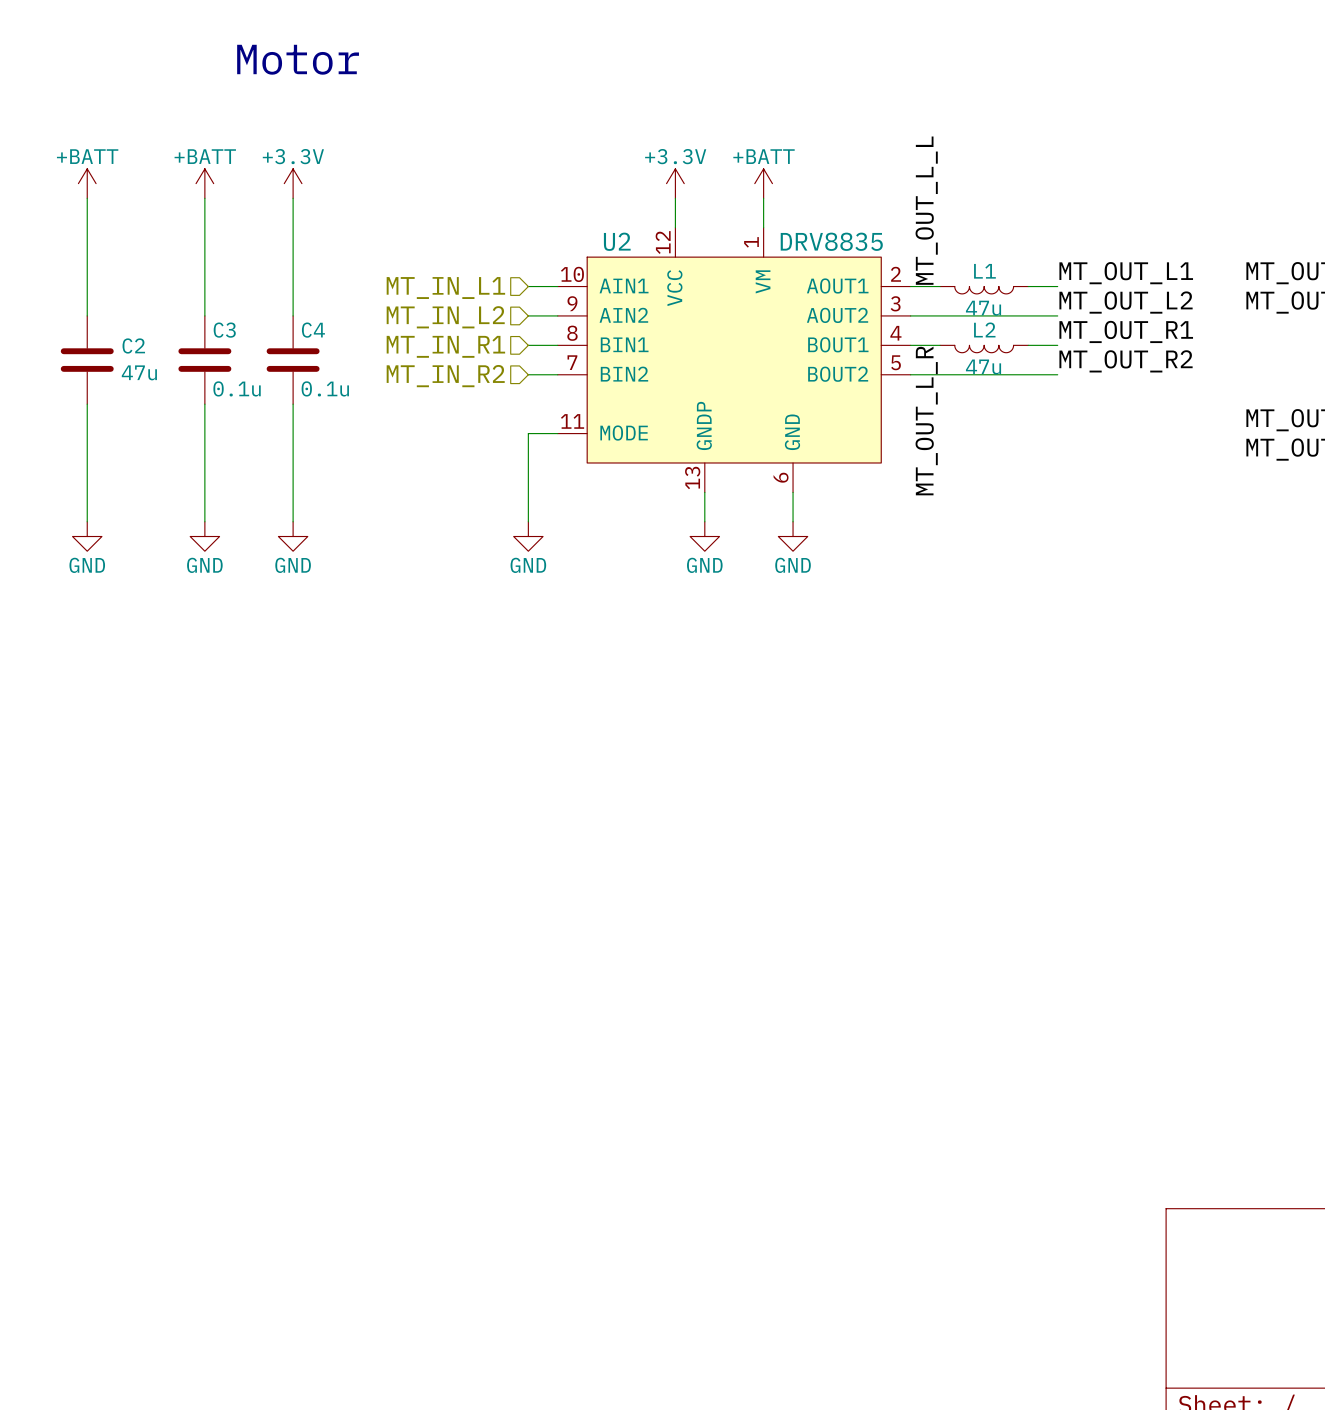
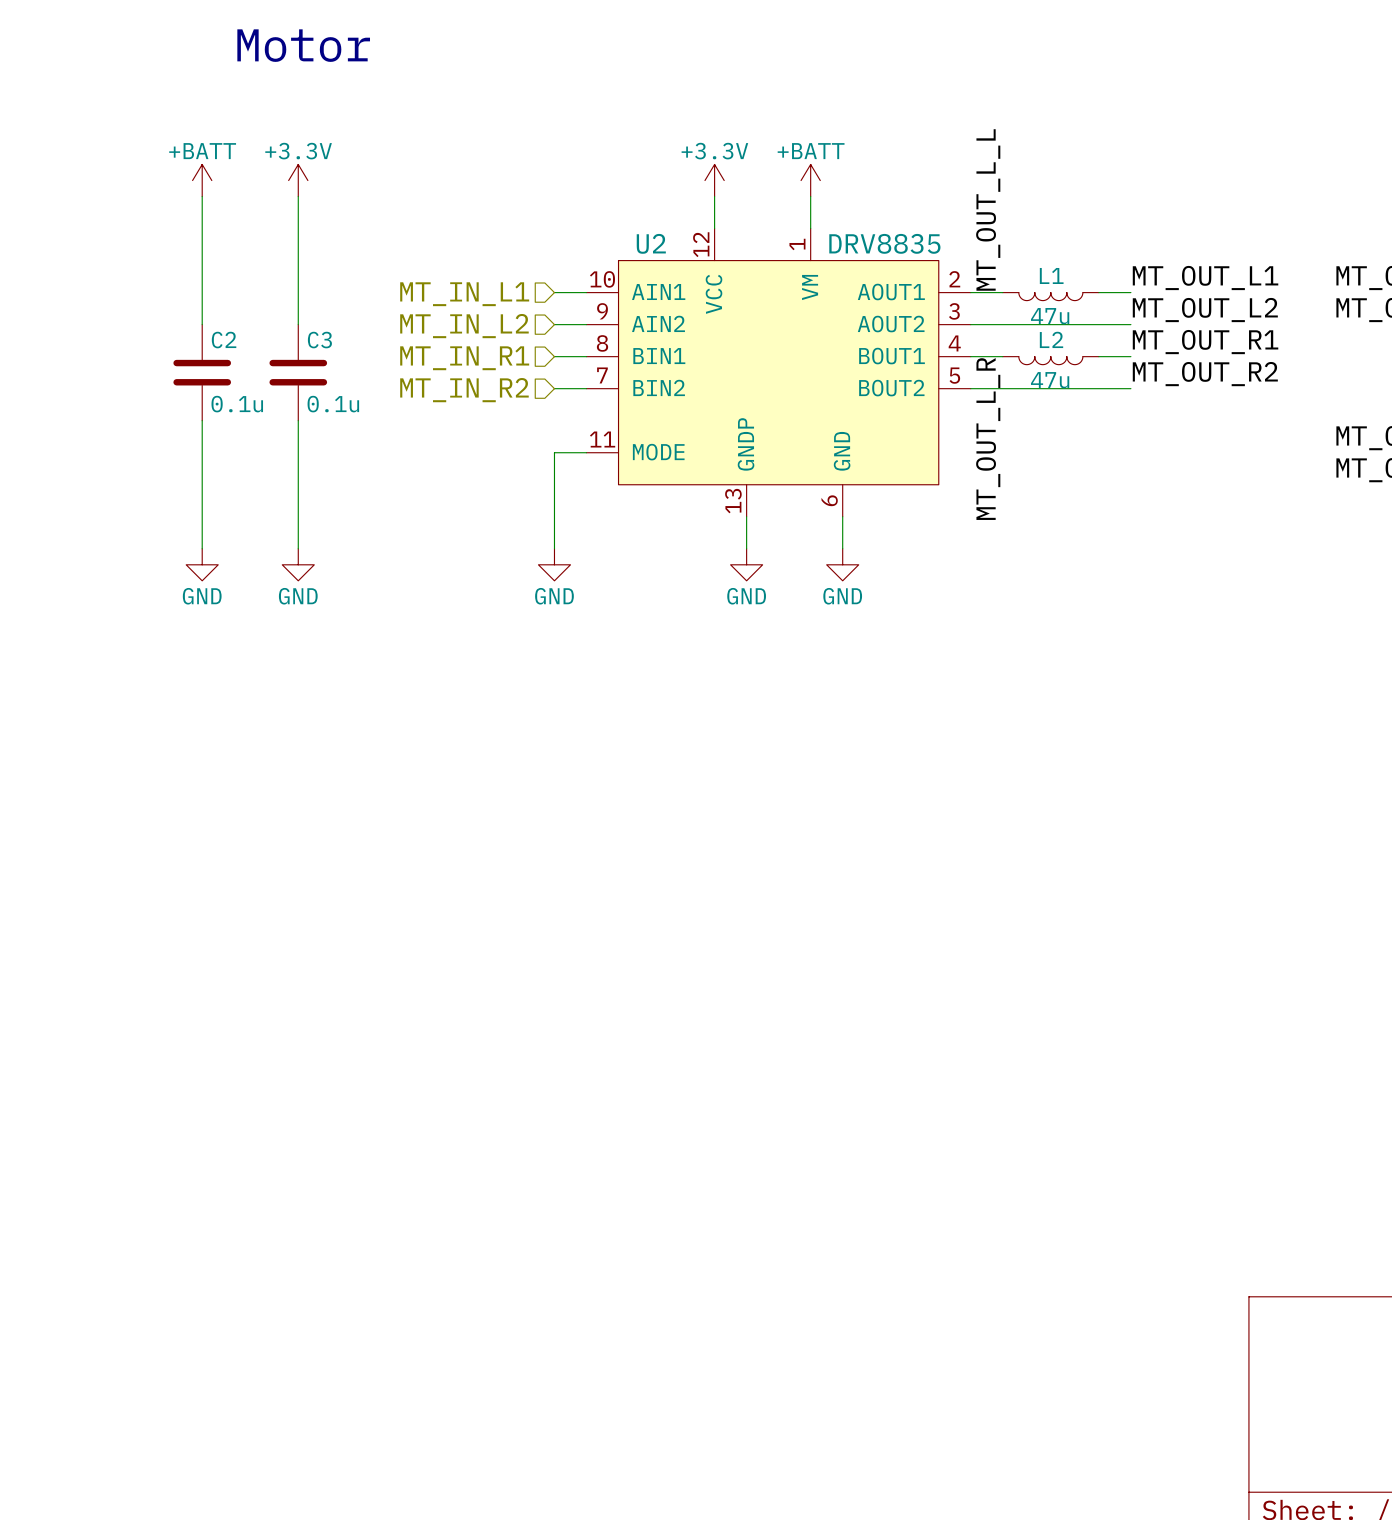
power symbol: +BATT (87, 183) -> none
wire: (87, 198) (87, 315) -> none
C3 name: C3 (224, 330) -> C2 (224, 340)
C4 name: C4 (313, 330) -> C3 (319, 340)
C2: 47u (87, 360) -> none
wire: (87, 404) (87, 521) -> none
power symbol: GND (87, 536) -> none

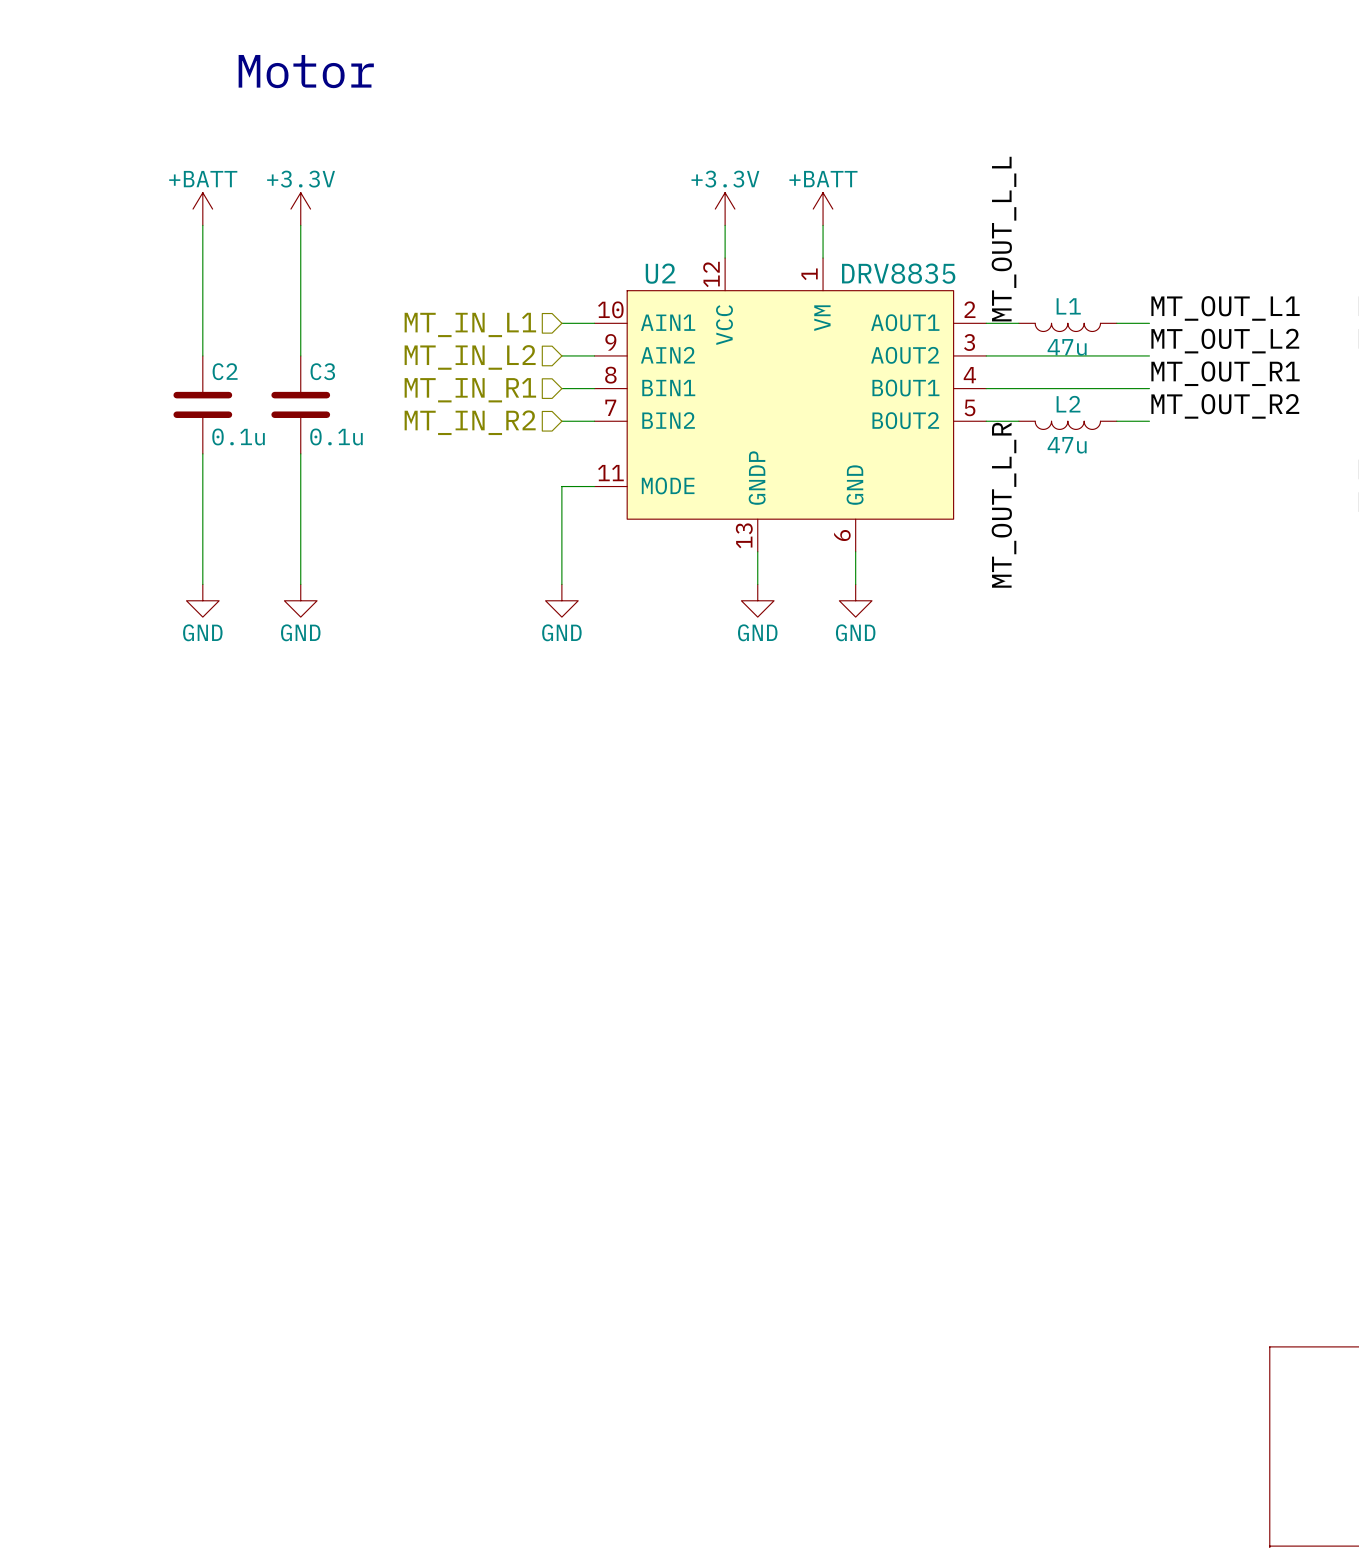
L2 position: (1050, 360) -> (1067, 425)
wire: (1002, 388) (1098, 388) -> (1018, 388) (1116, 388)
label position: MT_OUT_L_R (988, 439) -> MT_OUT_L_R (1004, 505)

